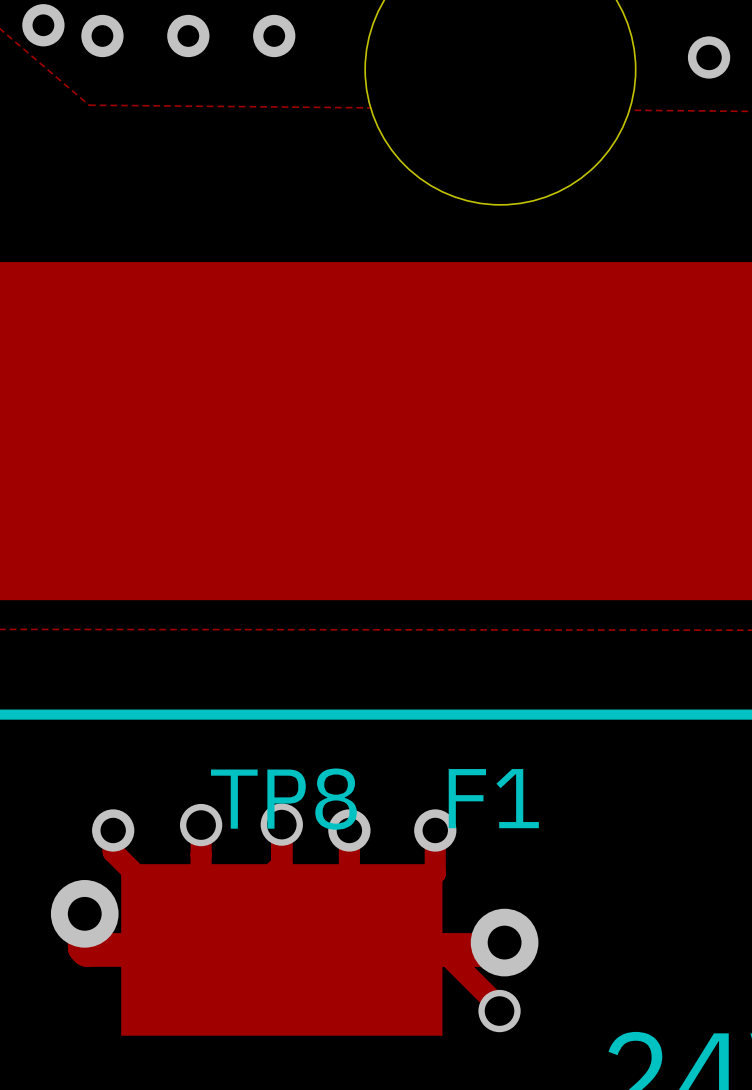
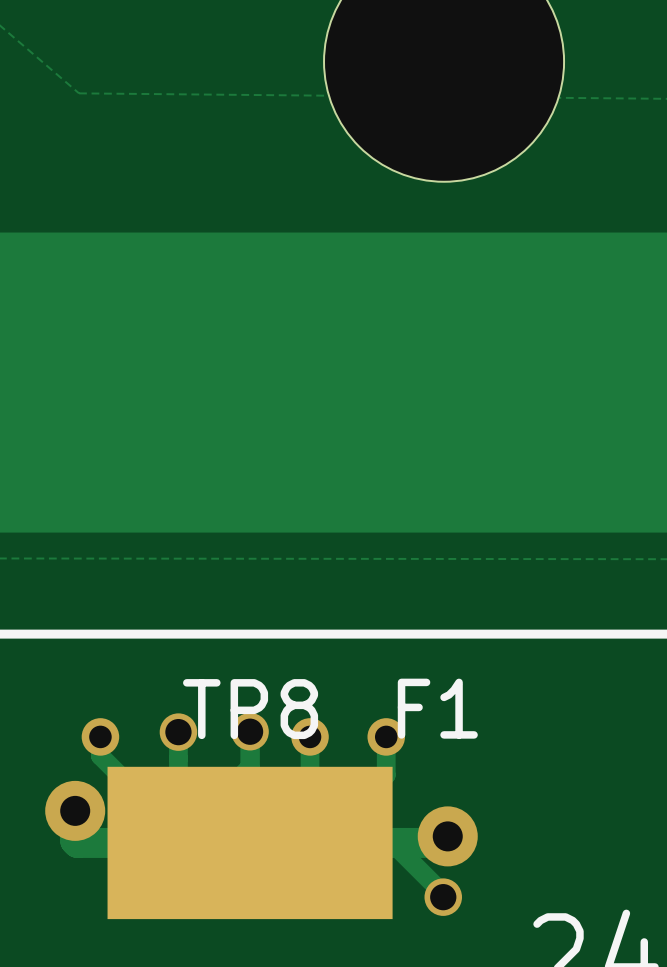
via: (43, 25) -> none
via: (102, 35) -> none
via: (188, 35) -> none
via: (274, 35) -> none
via: (709, 57) -> none

